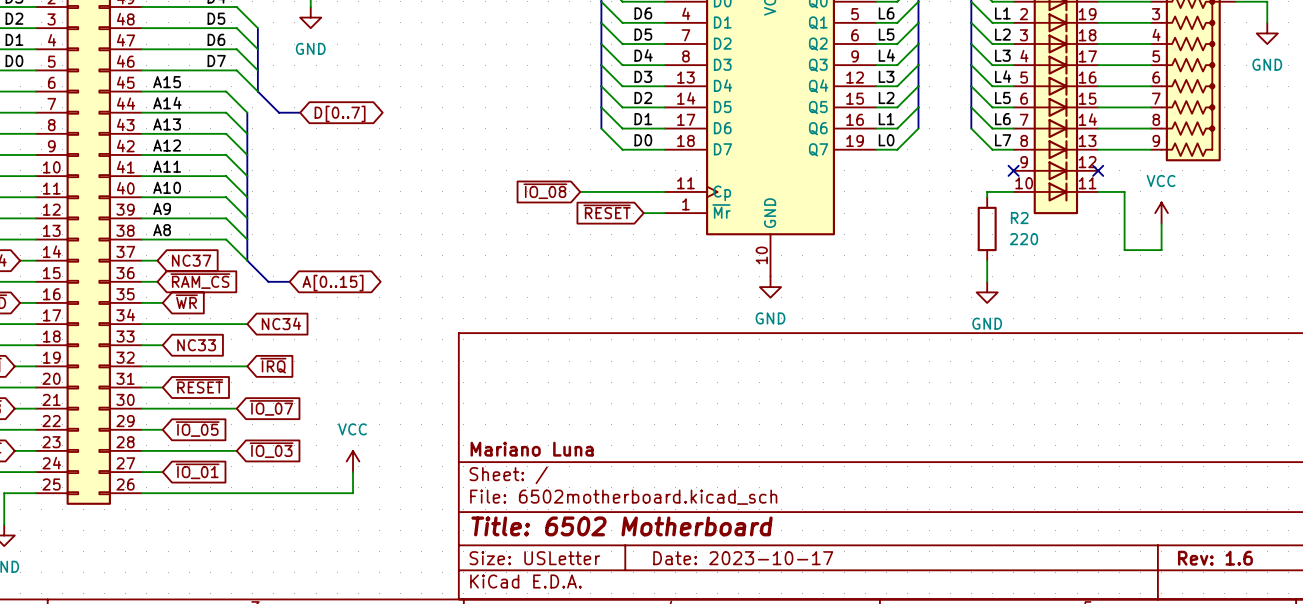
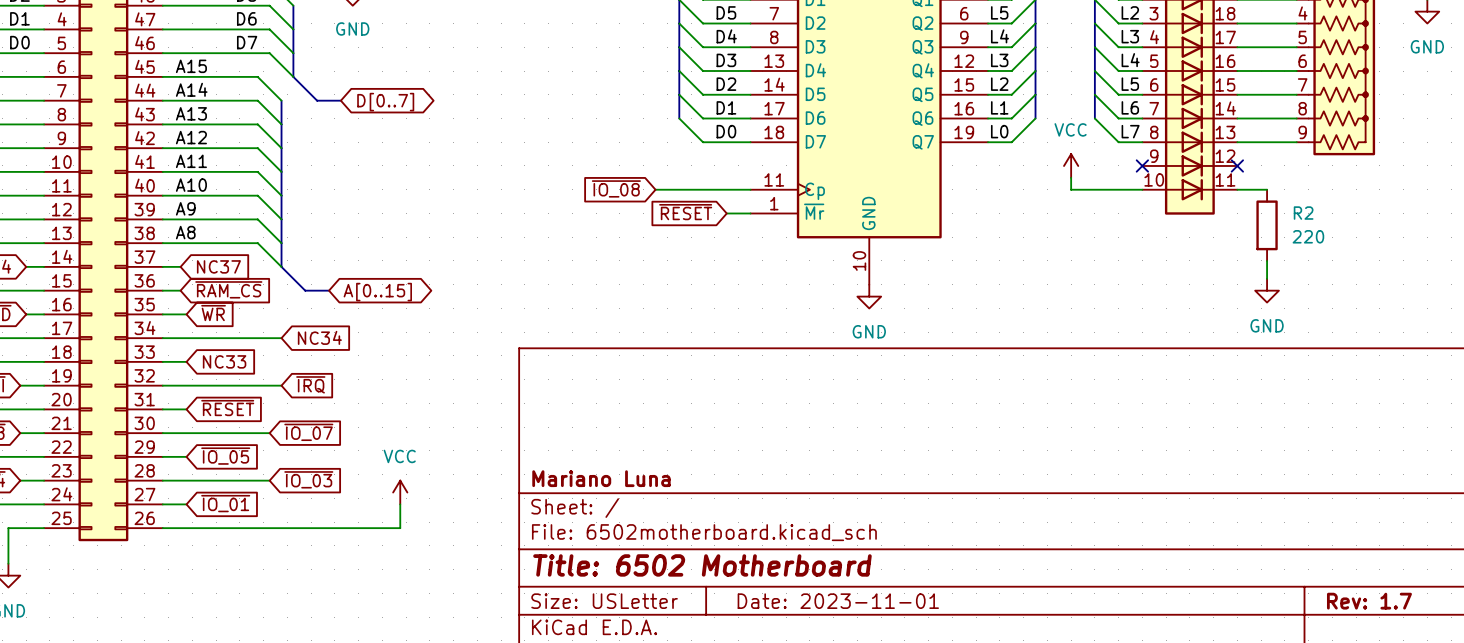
power symbol: none -> VCC (1071, 165)
wire: (987, 191) (987, 197) -> (1112, 189) (1071, 189) (1071, 177)
wire: (1124, 191) (1124, 250) (1161, 250) (1161, 223) -> none
power symbol: VCC (1161, 213) -> none
R2 position: (987, 228) -> (1267, 225)
wire: none -> (1267, 260) (1267, 278)
wire: (987, 260) (987, 281) -> none
power symbol position: GND (987, 292) -> GND (1267, 290)
title block: Date: 2023-10-17 (743, 558) -> Date: 2023-11-01 (838, 601)
title block: Rev: 1.6 (1215, 558) -> Rev: 1.7 (1369, 601)

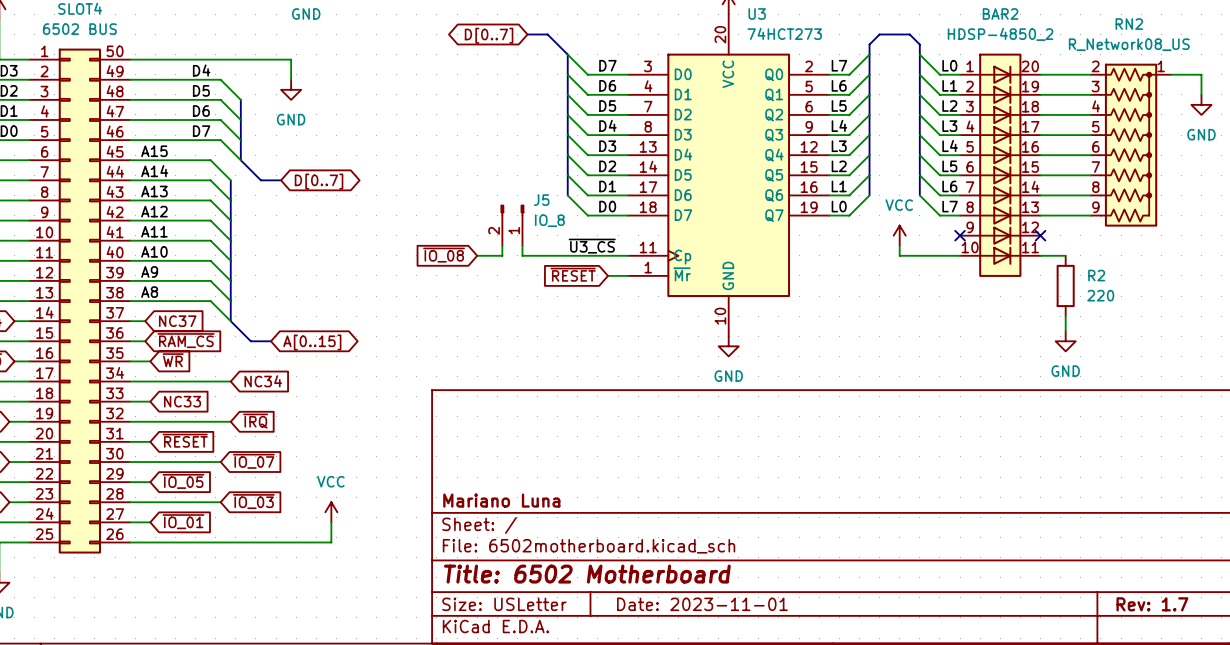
J5: none -> IO_8 (512, 225)
wire: none -> (502, 245) (502, 255) (477, 255)
wire: none -> (522, 245) (522, 255) (547, 255)
label: none -> ~{U3_CS} (592, 246)
global label position: ~{IO_08} (616, 188) -> ~{IO_08} (444, 255)

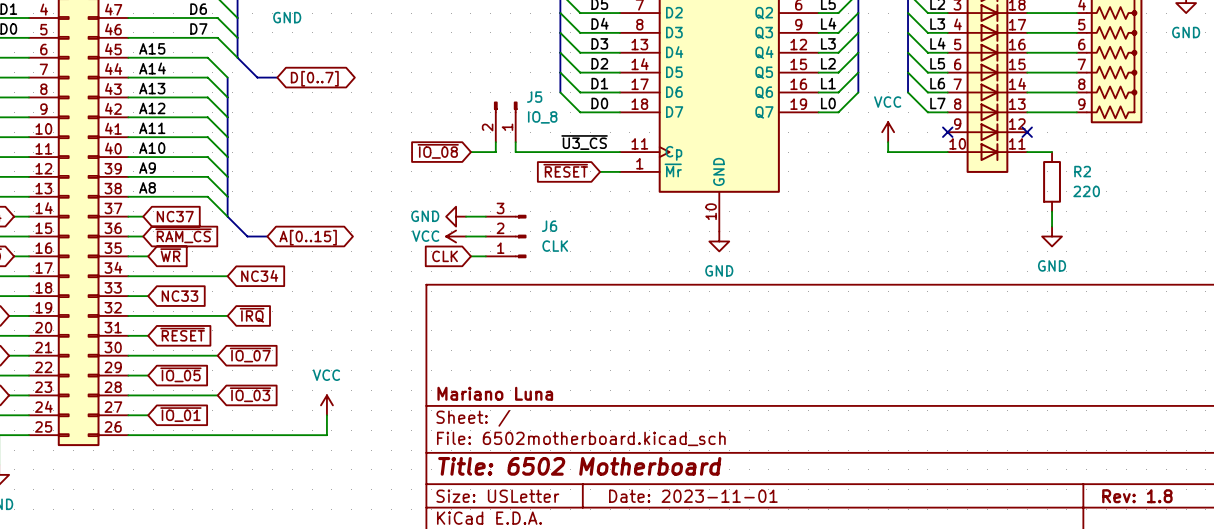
power symbol: none -> GND (456, 216)
wire: none -> (466, 216) (485, 216)
power symbol: none -> VCC (456, 236)
wire: none -> (466, 236) (485, 236)
J6: none -> CLK (506, 236)
global label: none -> CLK (445, 256)
wire: none -> (470, 256) (485, 256)
title block: Rev: 1.7 (1152, 604) -> Rev: 1.8 (1137, 496)

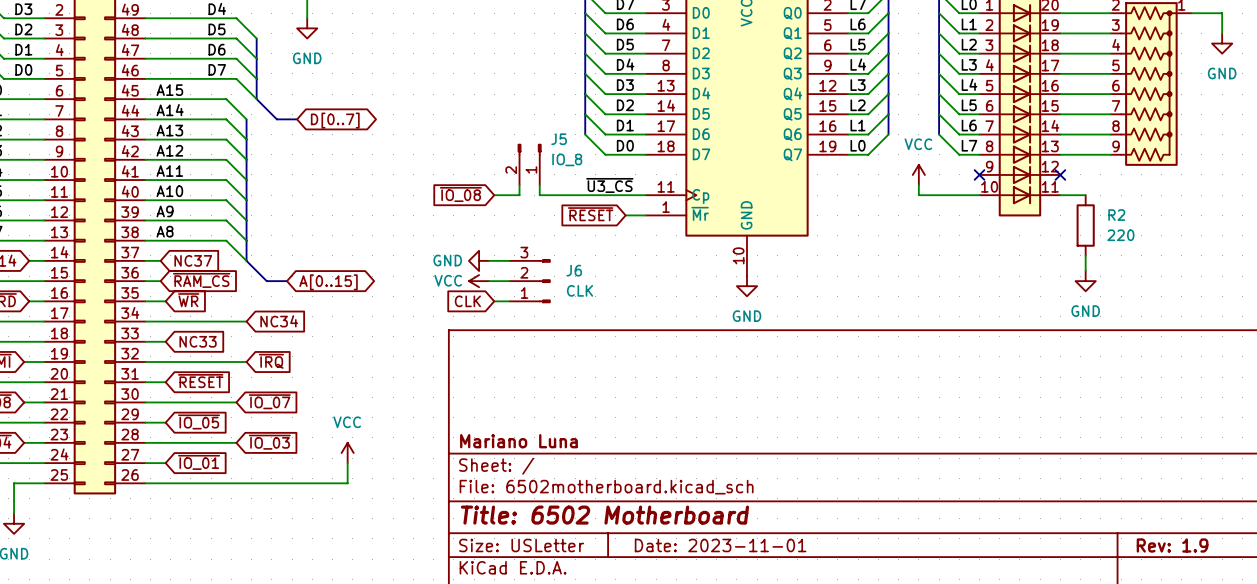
title block: Rev: 1.8 (1137, 496) -> Rev: 1.9 (1172, 545)

